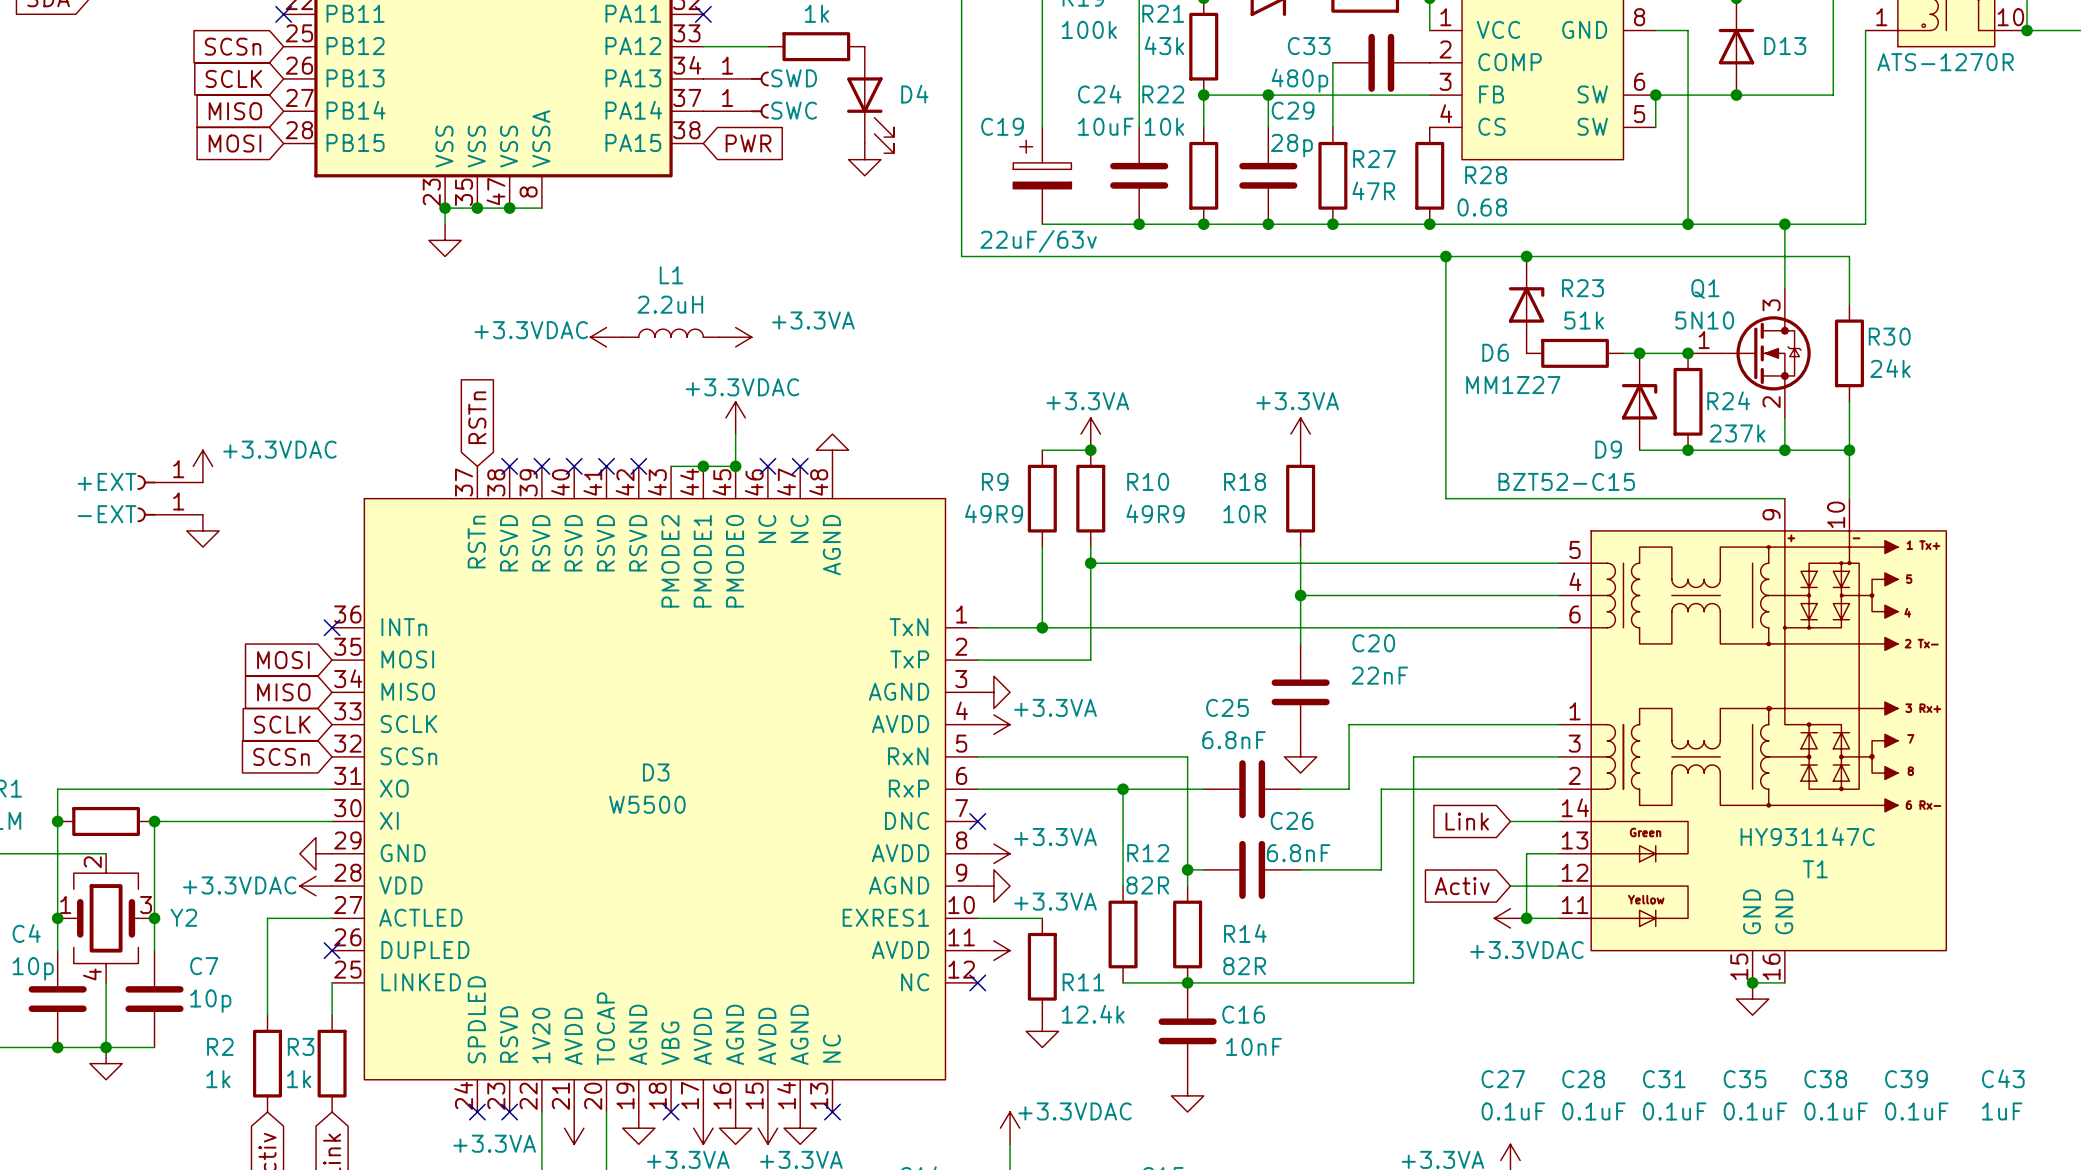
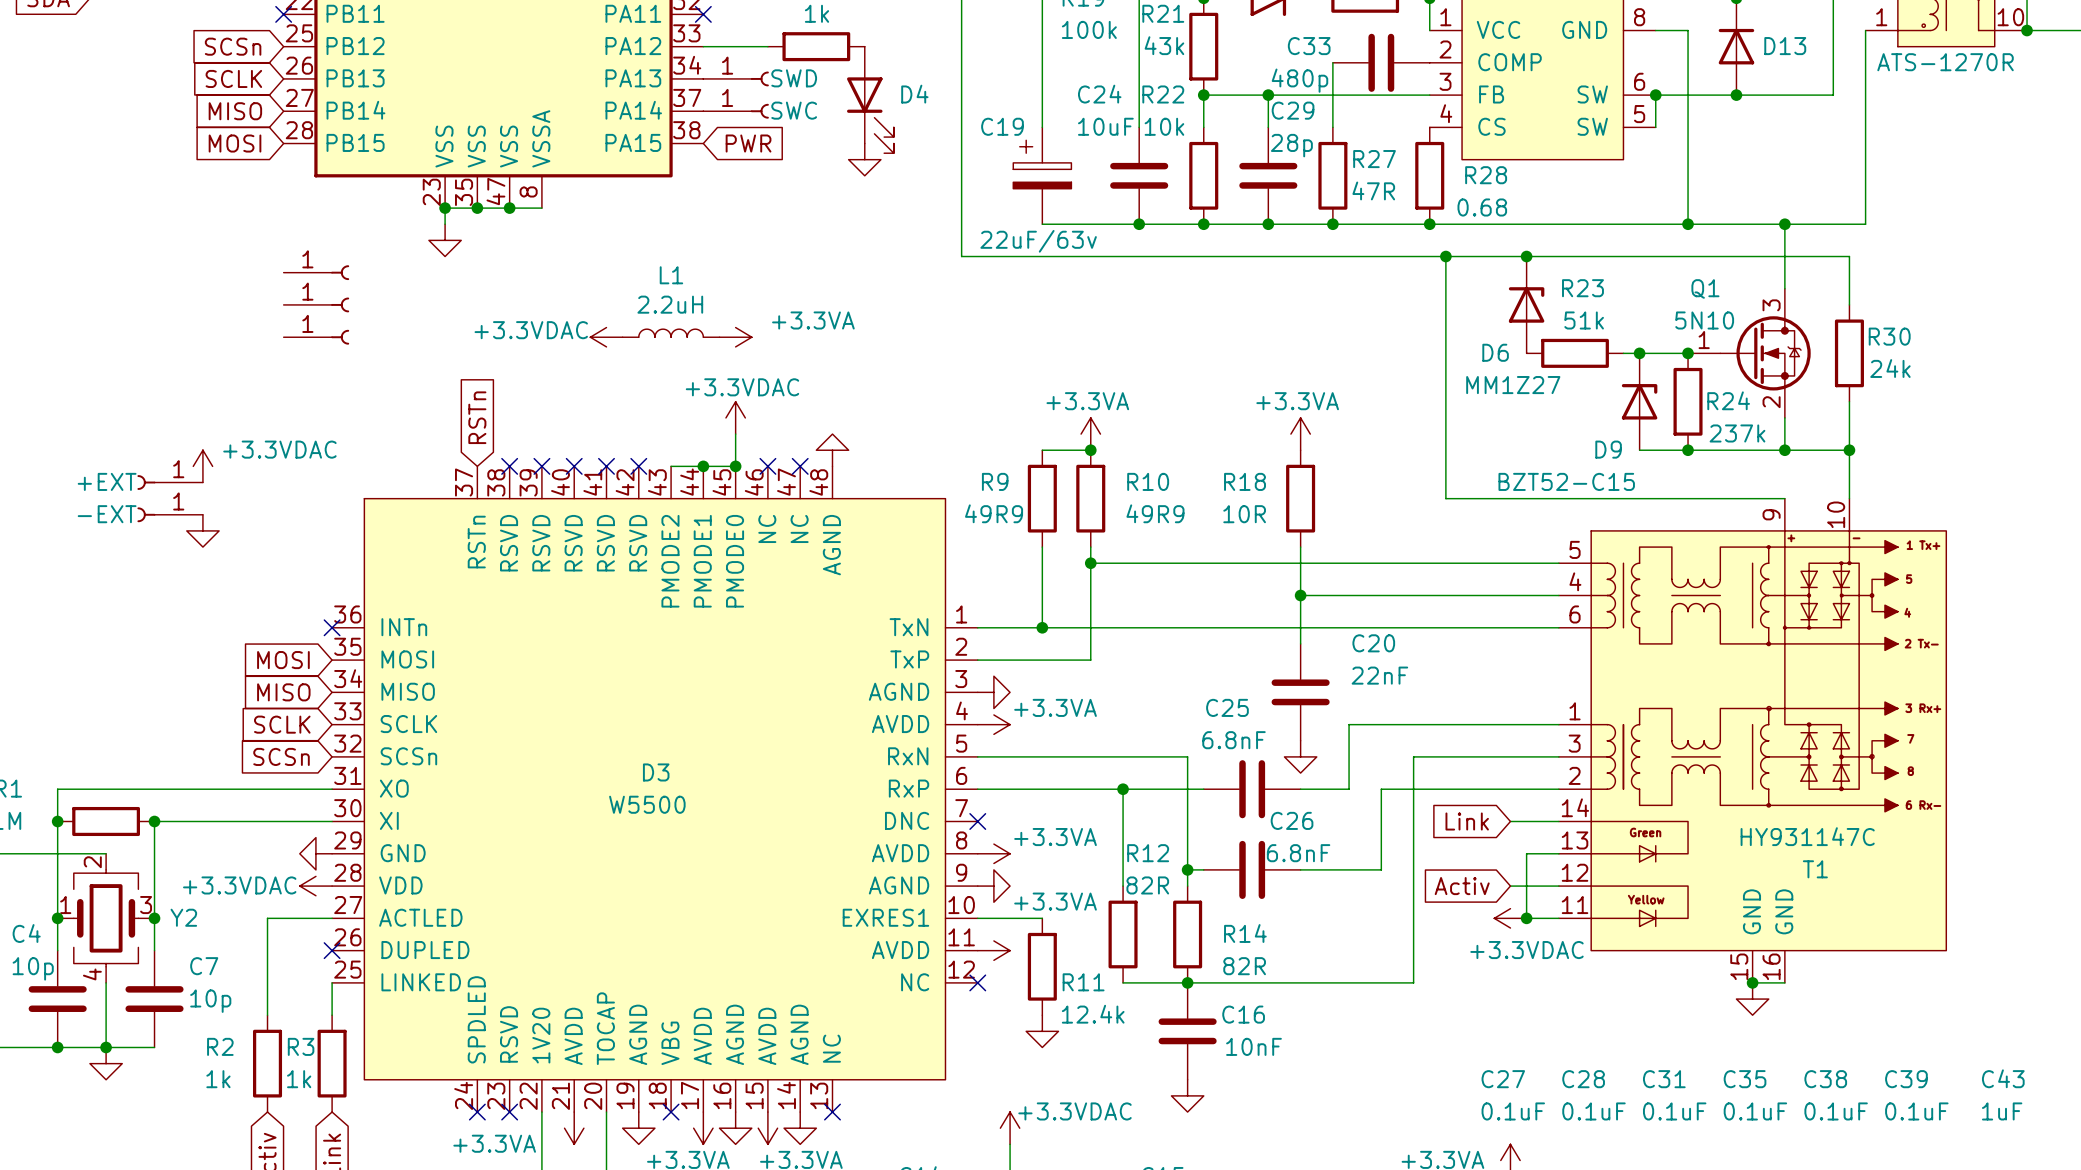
part: none -> (316, 272)
part: none -> (316, 304)
part: none -> (316, 337)

